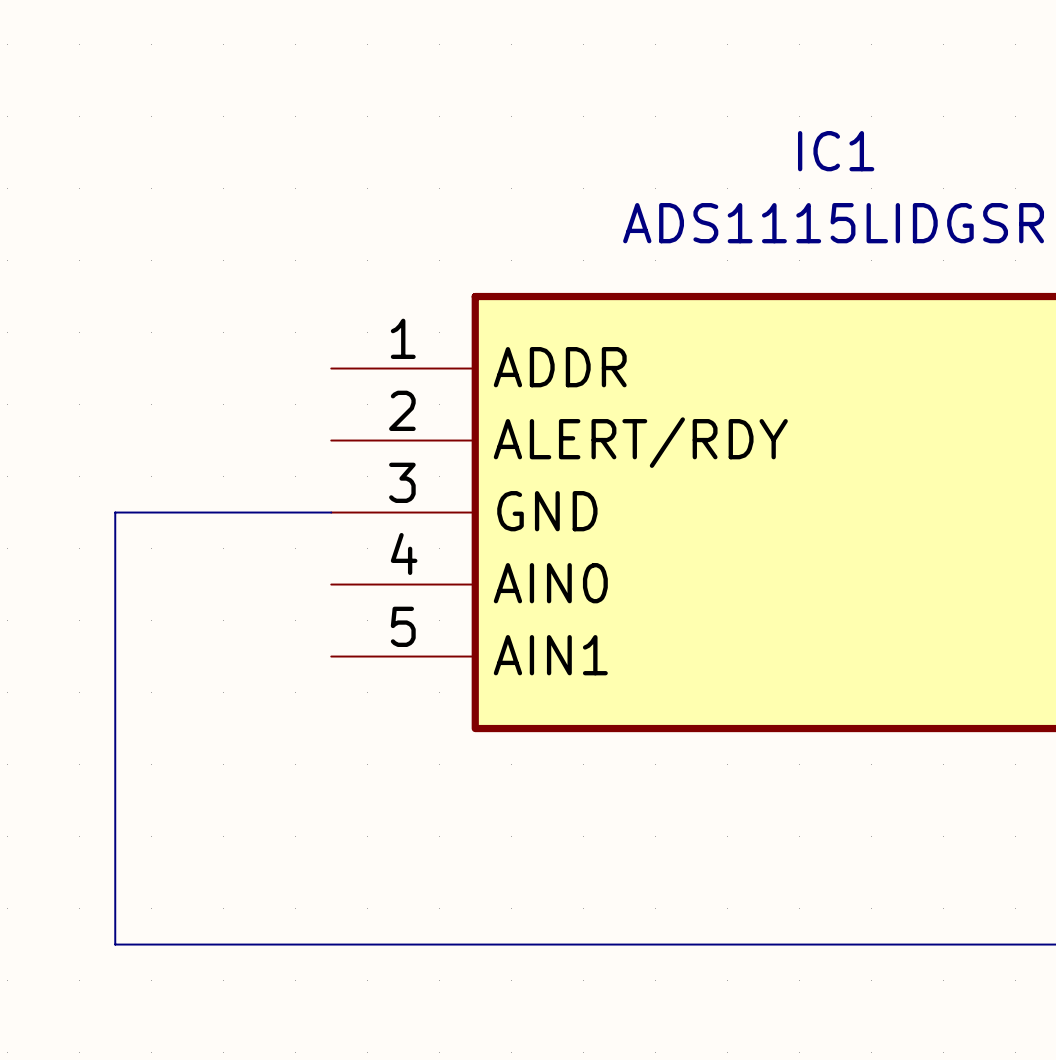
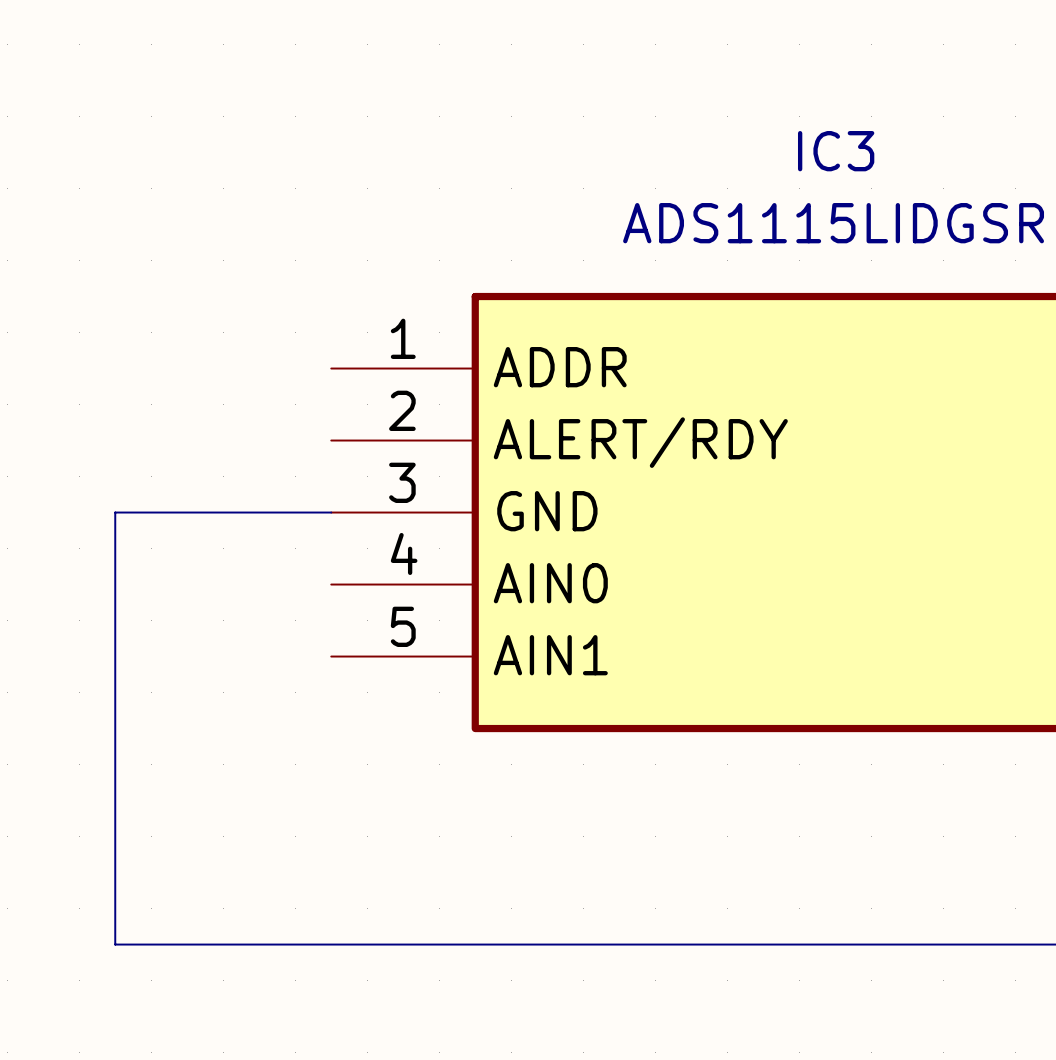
IC1 name: IC1 (836, 151) -> IC3 (836, 151)

